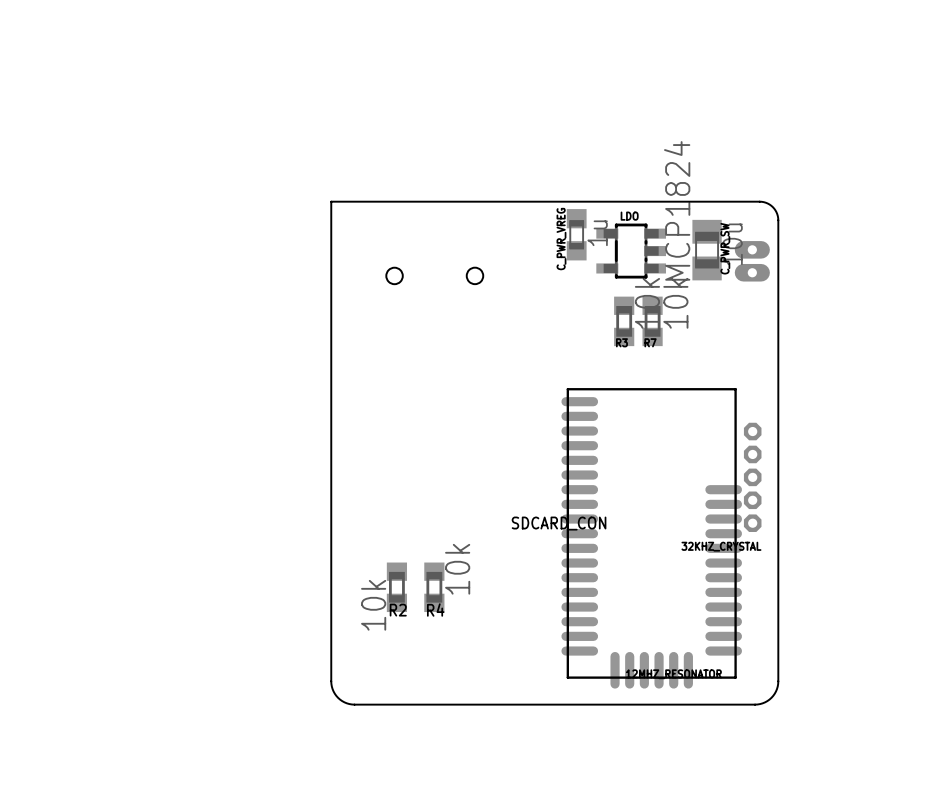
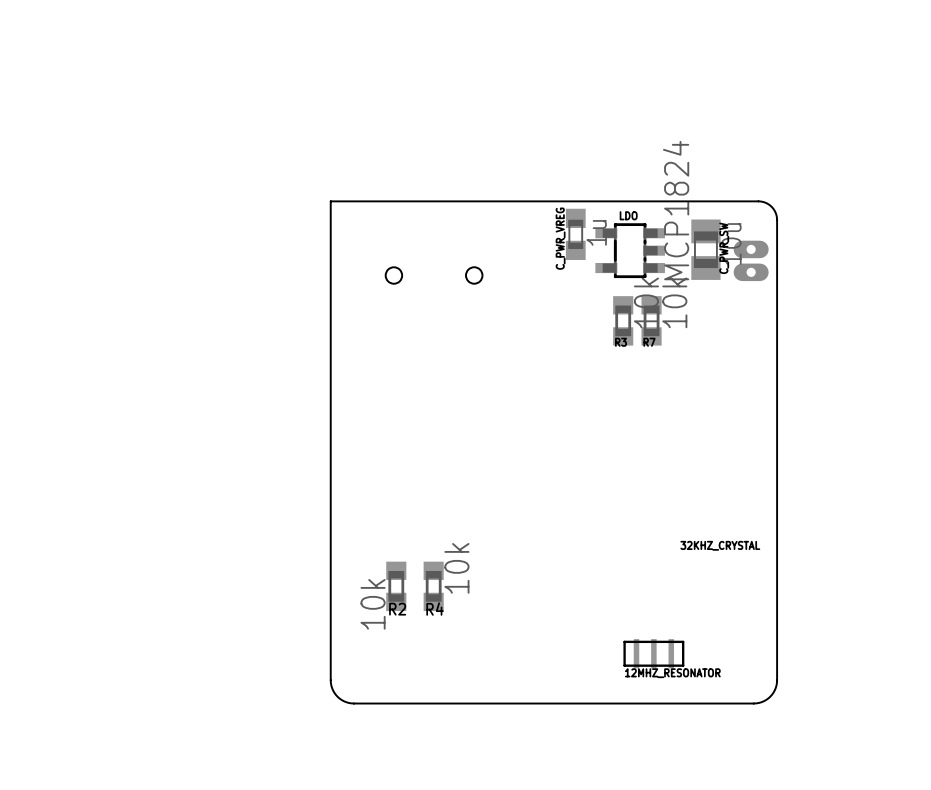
part: (752, 477) -> none
text: SDCARD_CON (559, 523) -> none
part: (651, 538) -> none
part: none -> (653, 653)

